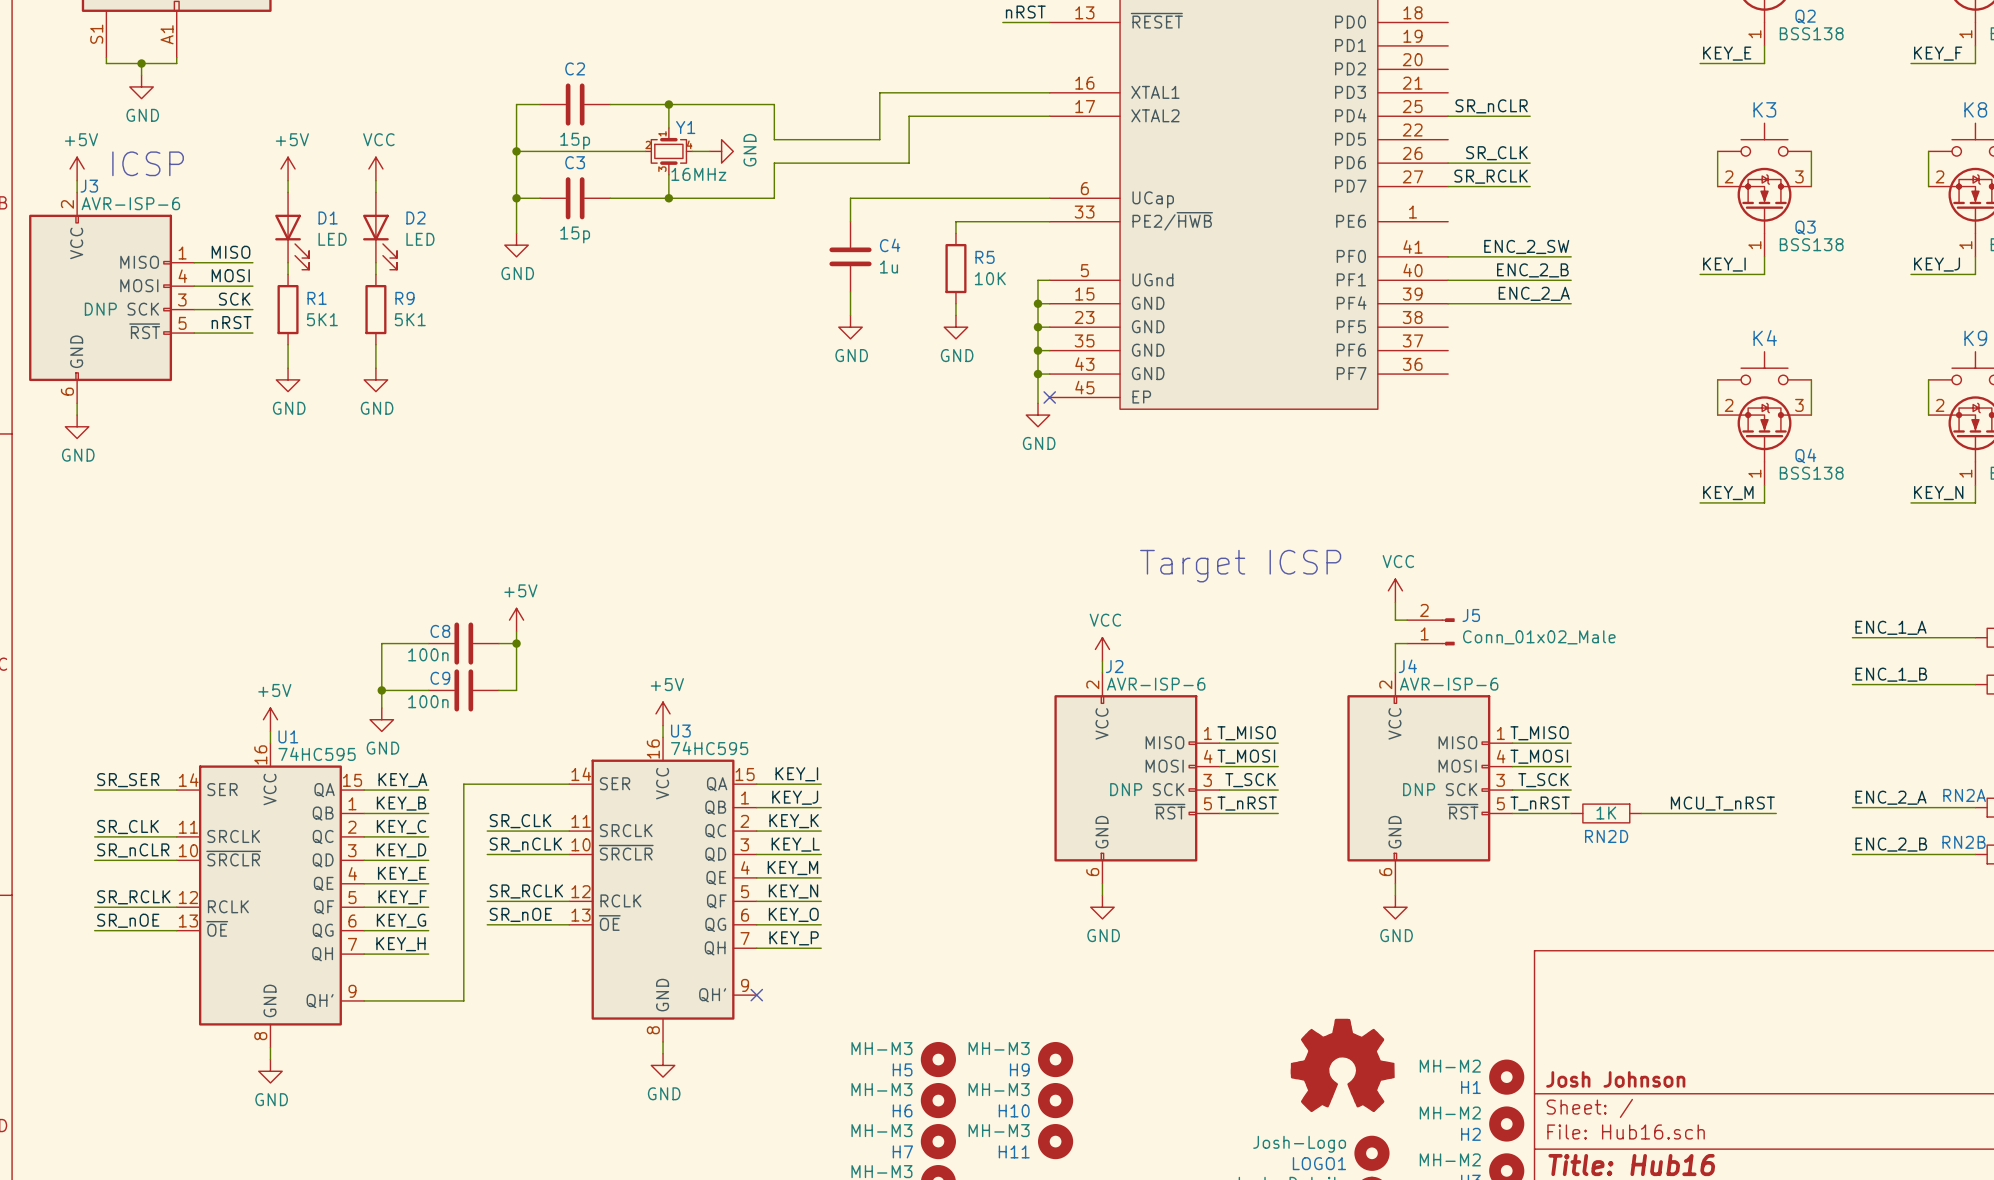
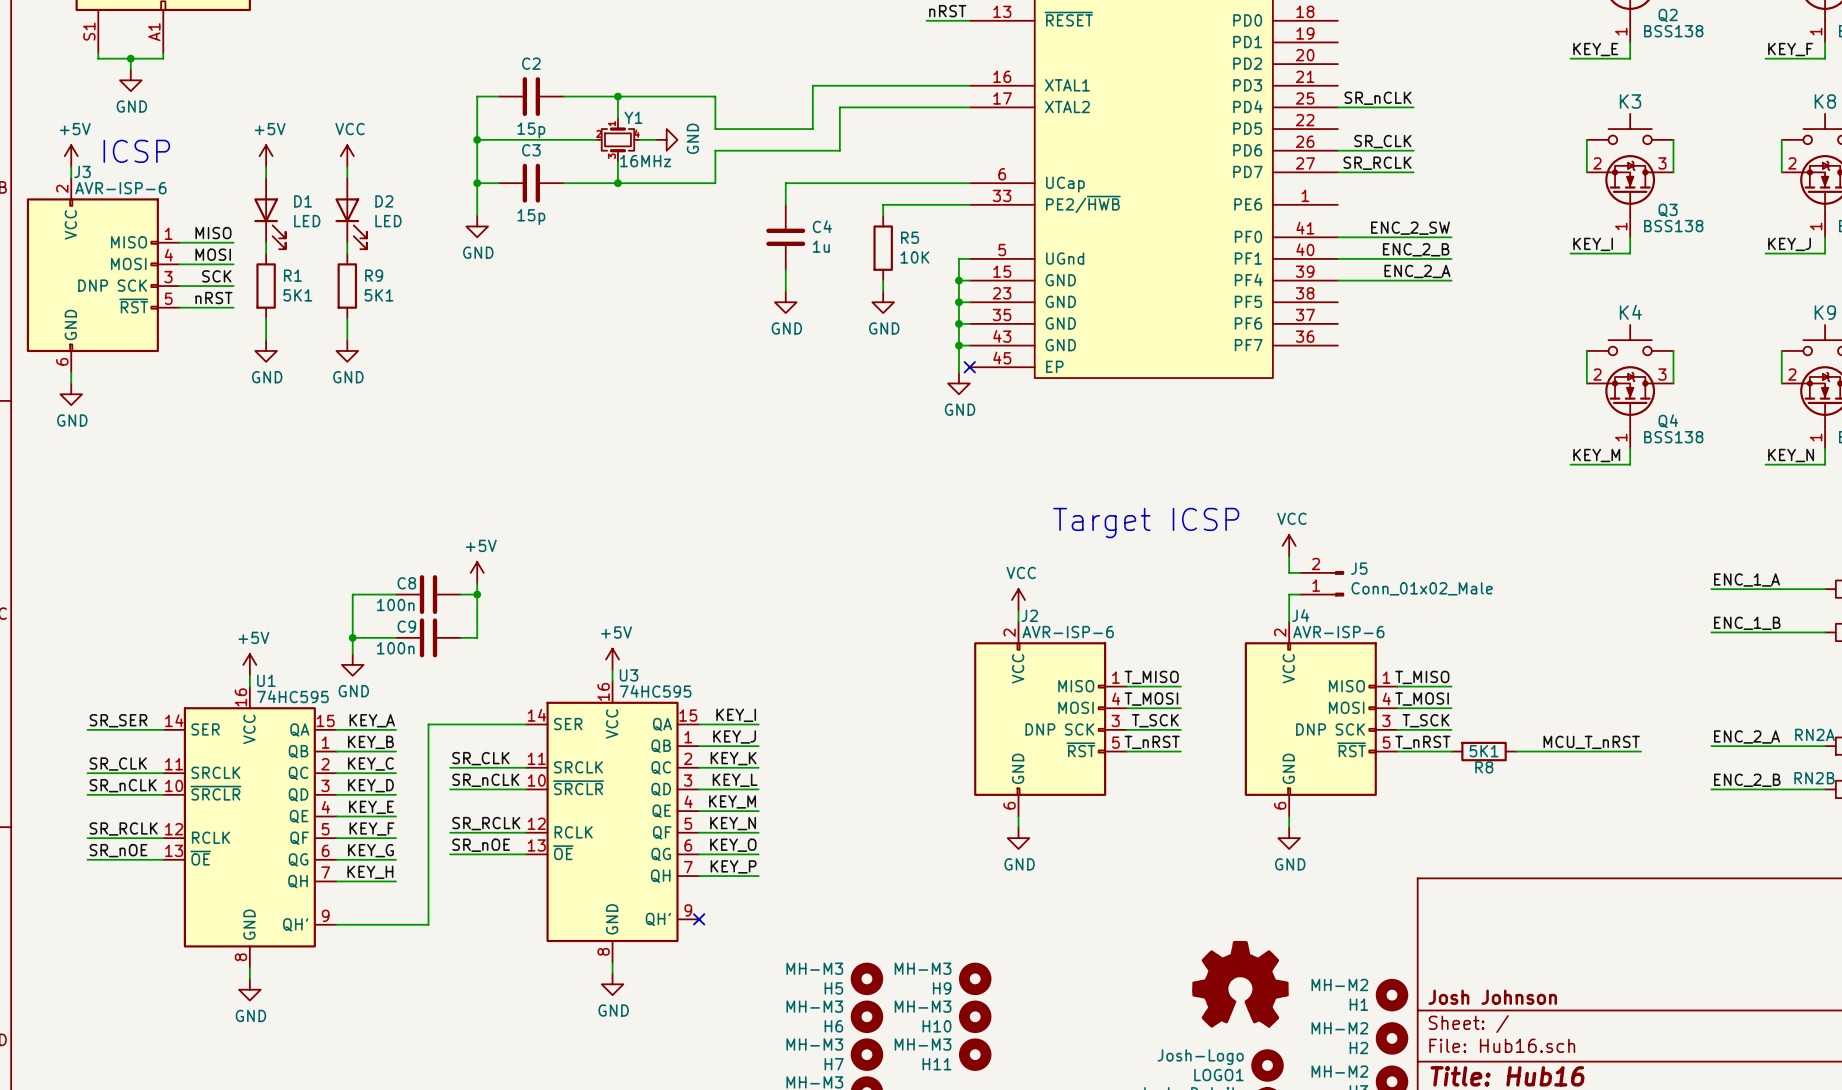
label: SR_nCLR (1491, 106) -> SR_nCLK (1378, 98)
RN2D: 1K (1606, 813) -> none
R8: none -> 5K1 (1484, 751)
label: SR_nCLR (133, 850) -> SR_nCLK (123, 785)

